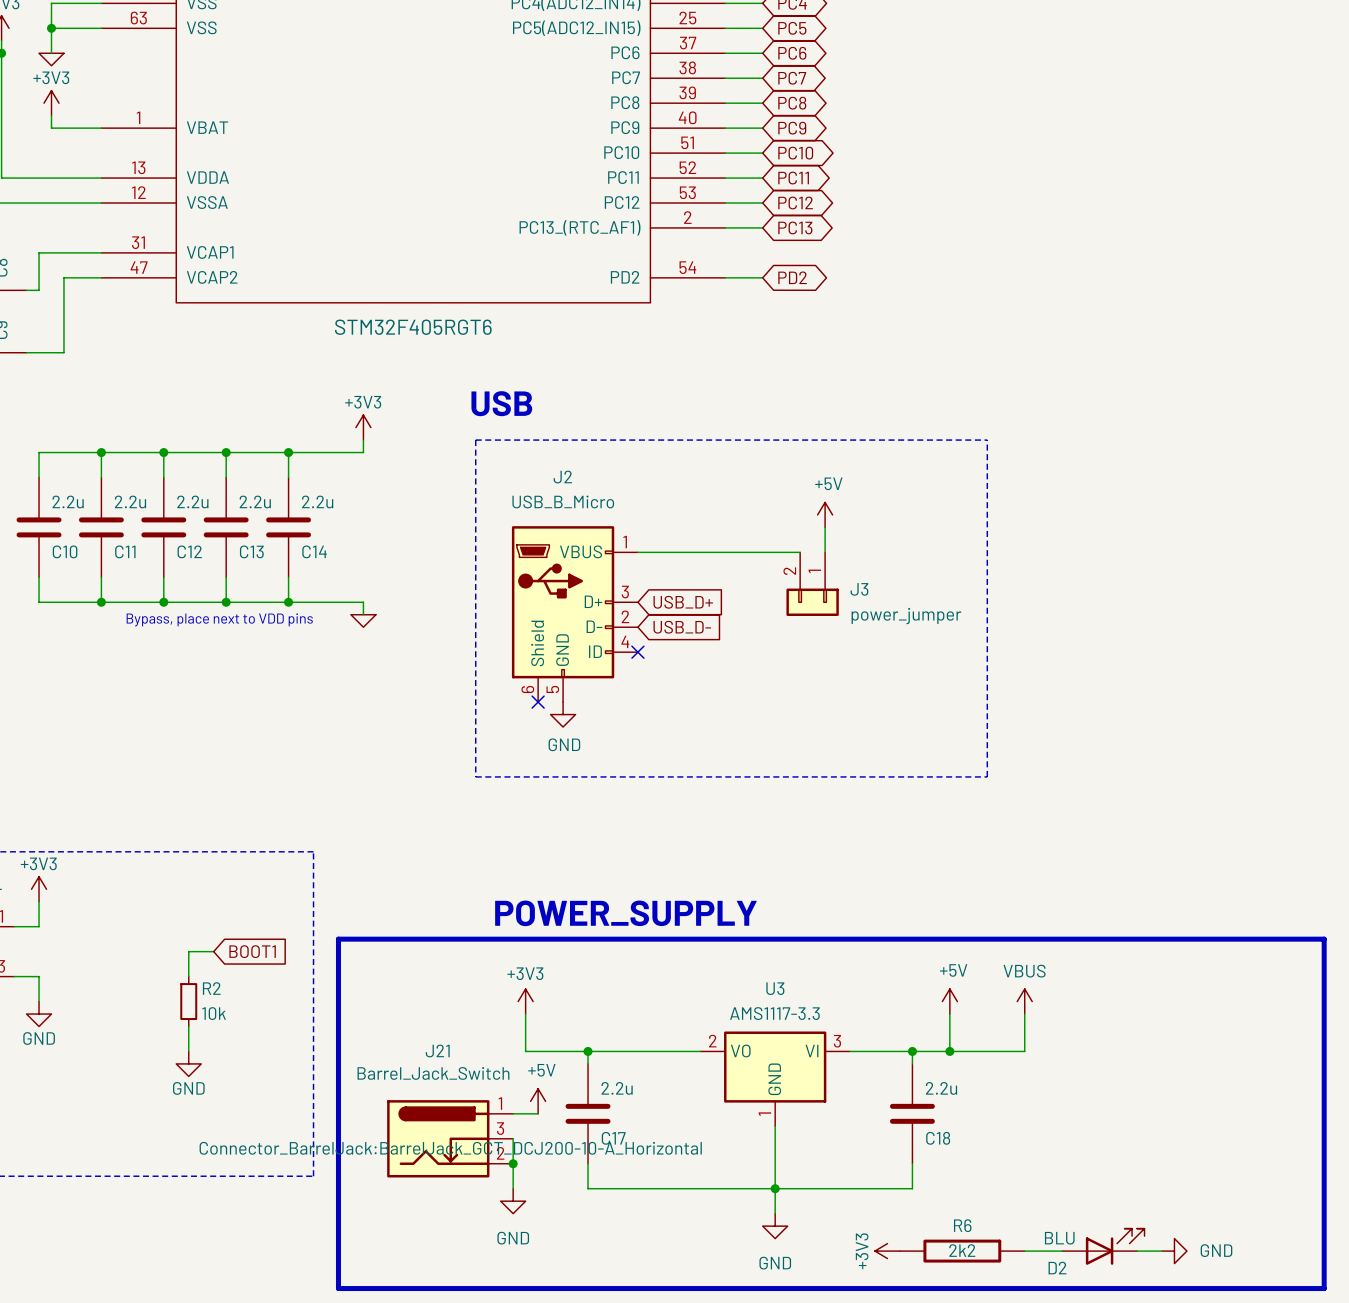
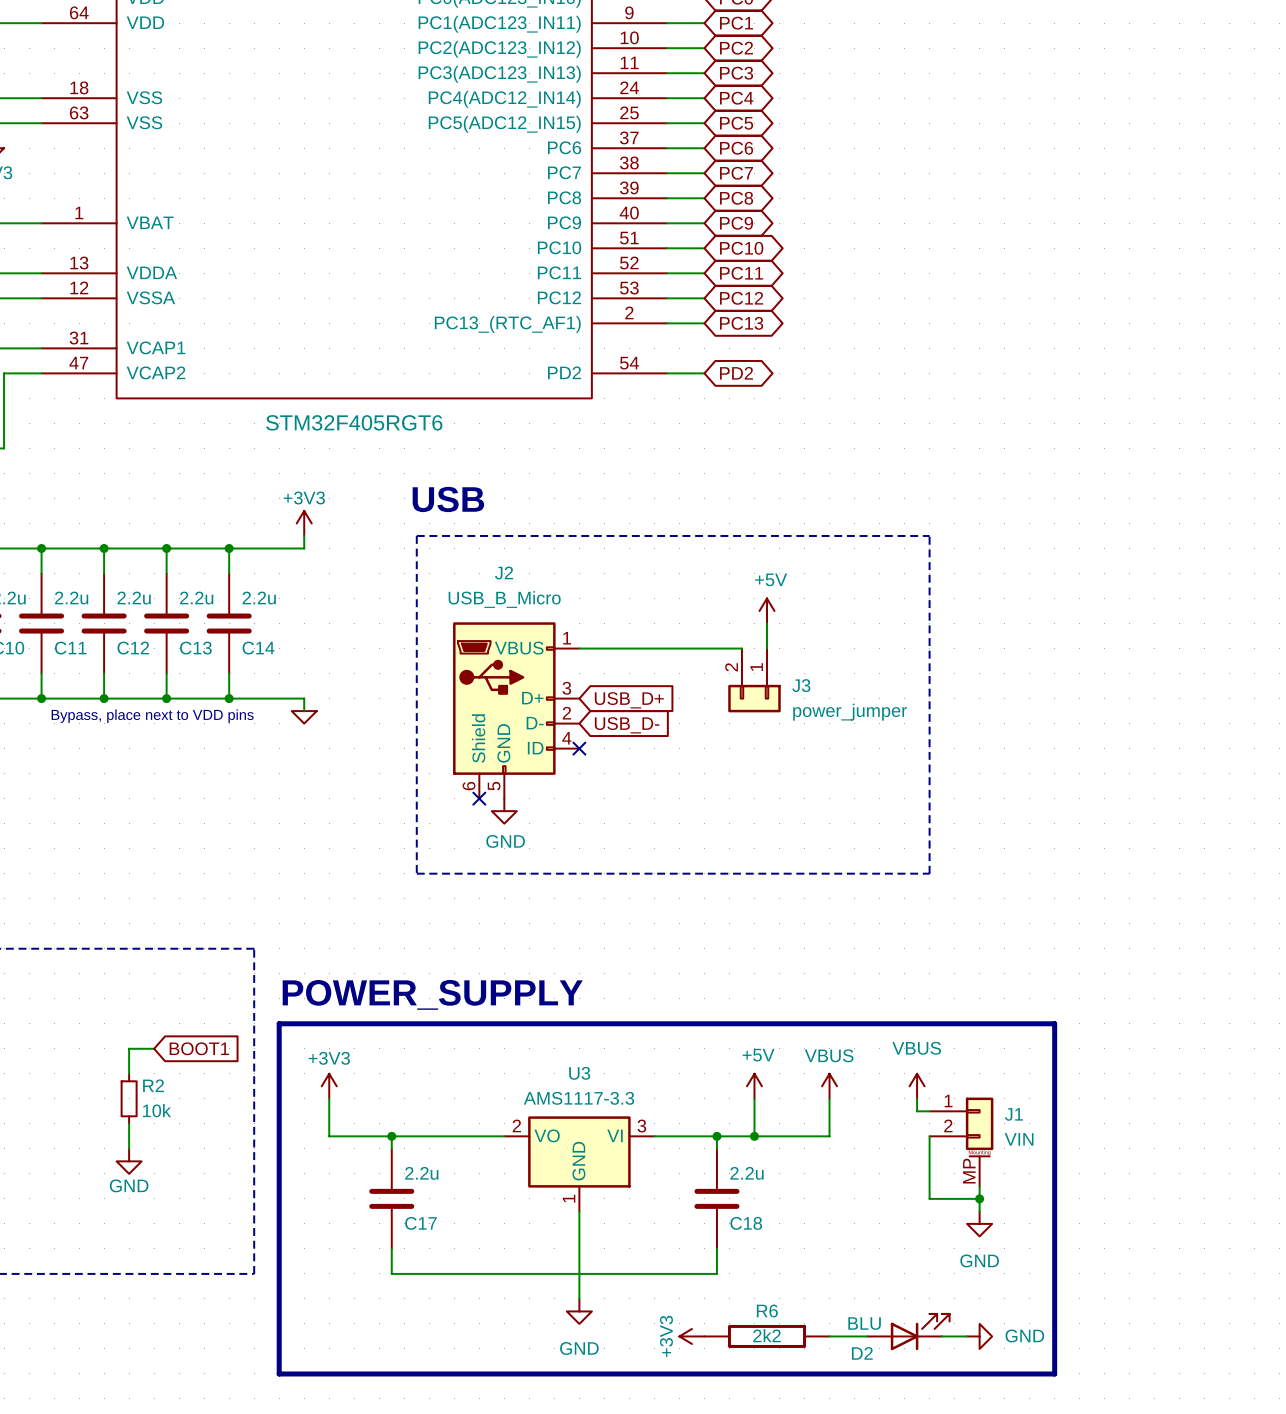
text position: POWER_SUPPLY (625, 913) -> POWER_SUPPLY (432, 994)
line: (338, 939) (1324, 939) (1324, 1288) (338, 1288) (338, 1276) -> (279, 1036) (279, 1023) (1054, 1023) (1054, 1373) (279, 1373)
power symbol text position: VBUS (1024, 971) -> VBUS (916, 1048)
power symbol: none -> VBUS (829, 1086)
power symbol position: +3V3 (525, 1001) -> +3V3 (329, 1086)
power symbol position: +5V (949, 1001) -> +5V (754, 1086)
wire: none -> (917, 1098) (917, 1111) (929, 1111)
power symbol position: VBUS (1024, 1001) -> VBUS (917, 1086)
wire: (525, 1014) (525, 1051) (700, 1051) -> (329, 1098) (329, 1136) (504, 1136)
wire: (949, 1014) (949, 1051) -> (754, 1098) (754, 1136)
wire: (1024, 1014) (1024, 1051) (850, 1051) -> (829, 1098) (829, 1136) (654, 1136)
junction: none -> (391, 1136)
junction: none -> (716, 1136)
junction: none -> (754, 1136)
wire: none -> (929, 1136) (929, 1198) (979, 1198)
J1: none -> VIN (961, 1141)
junction: (588, 1051) -> none
junction: (912, 1051) -> none
junction: (949, 1051) -> none
U3 position: (775, 1078) -> (579, 1163)
wire: none -> (979, 1186) (979, 1211)
power symbol: +5V (538, 1101) -> none
junction: none -> (979, 1198)
wire: (513, 1113) (538, 1113) -> none
C17 position: (588, 1113) -> (391, 1198)
wire: none -> (579, 1211) (579, 1298)
C18 position: (912, 1113) -> (716, 1198)
power symbol: none -> GND (979, 1223)
J21: Barrel_Jack_Switch (450, 1138) -> none
wire: (513, 1138) (513, 1188) -> none
junction: (513, 1163) -> none
wire: (588, 1163) (588, 1188) (912, 1188) (912, 1163) -> none
wire: (775, 1176) (775, 1213) -> (716, 1273) (391, 1273) (391, 1248)
junction: (775, 1188) -> none
power symbol: GND (513, 1201) -> none
power symbol: none -> GND (579, 1311)
power symbol: GND (775, 1226) -> none
power symbol: none -> GND (979, 1336)
D2 position: (1103, 1246) -> (908, 1332)
power symbol position: +3V3 (887, 1251) -> +3V3 (691, 1336)
R6 position: (962, 1251) -> (766, 1336)
wire: (1024, 1251) (1062, 1251) -> (829, 1336) (867, 1336)
wire: (1137, 1251) (1161, 1251) -> (942, 1336) (967, 1336)
power symbol: GND (1174, 1251) -> none

